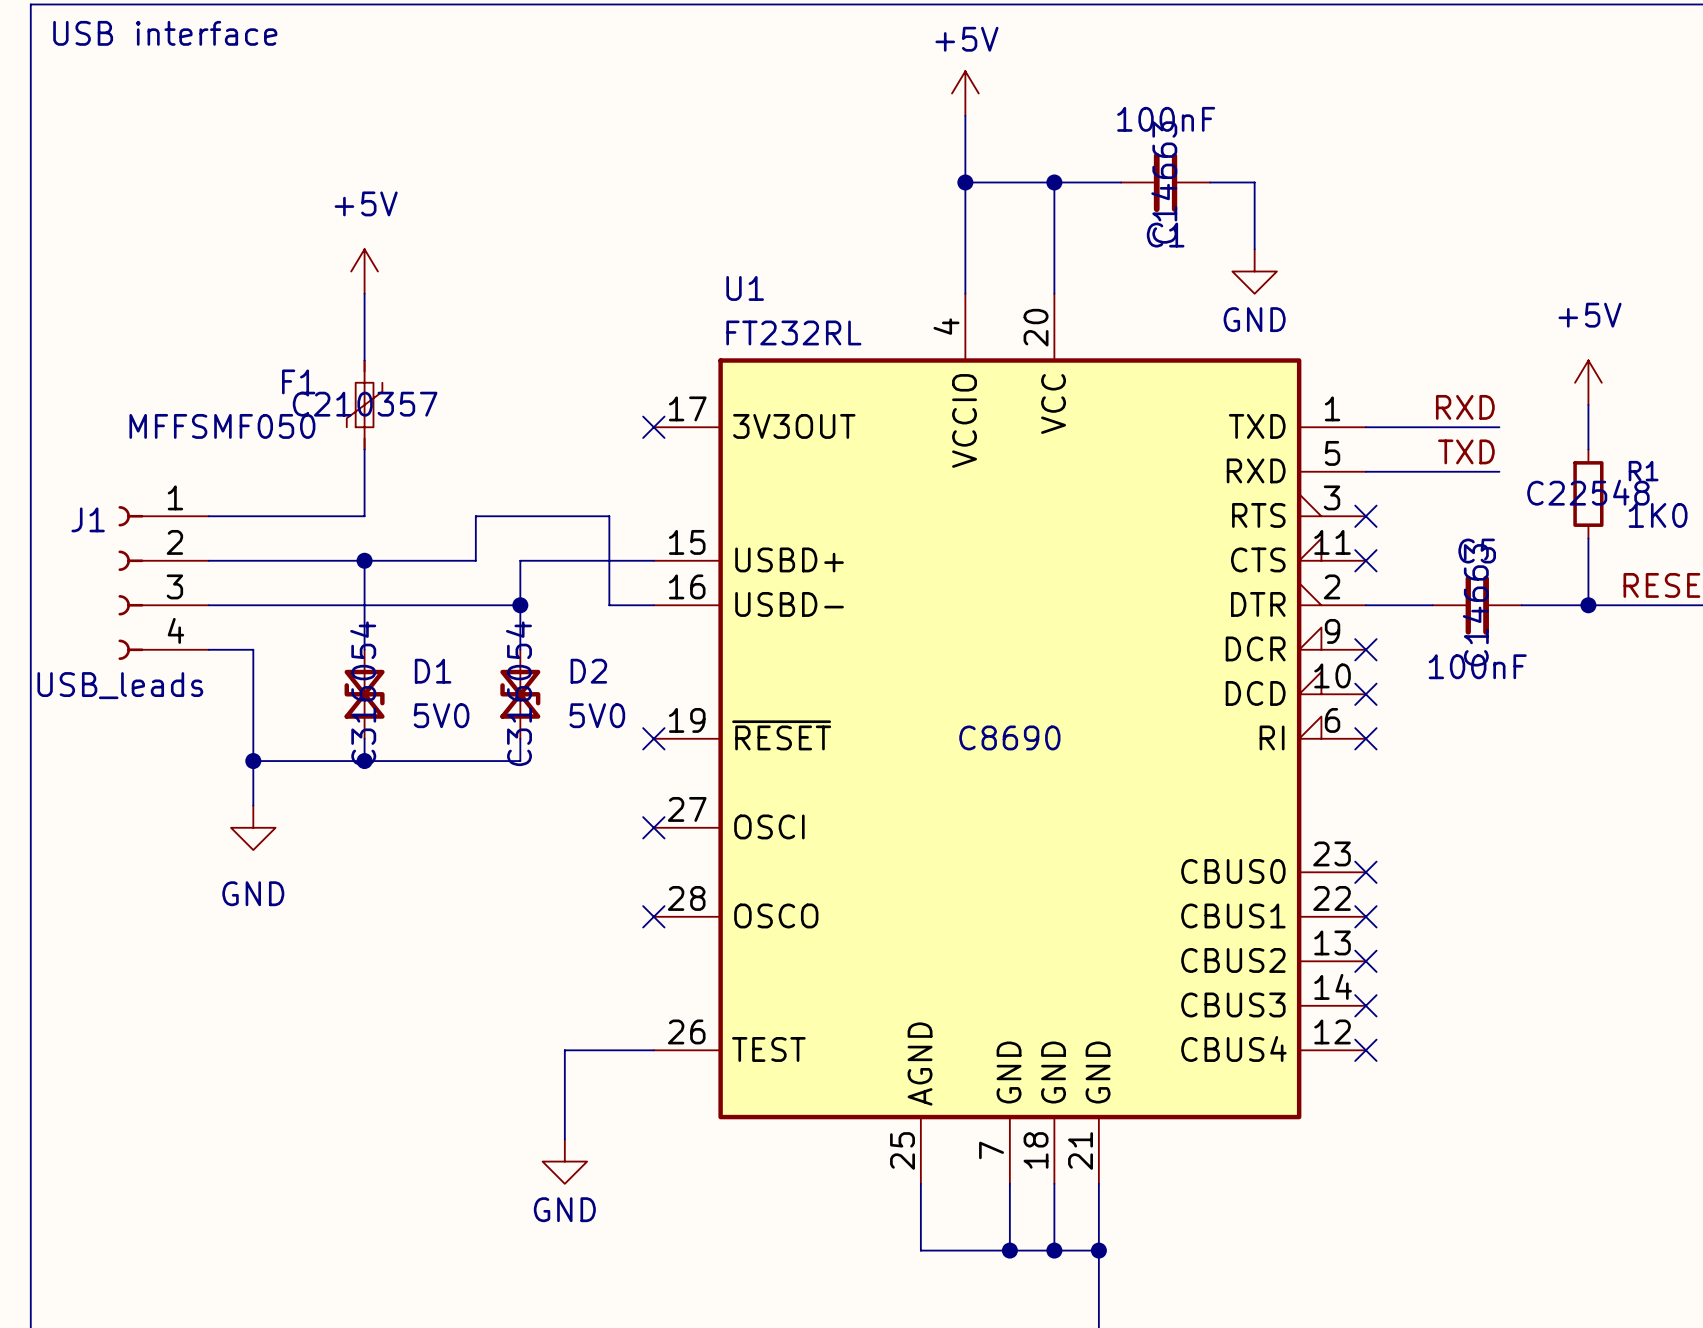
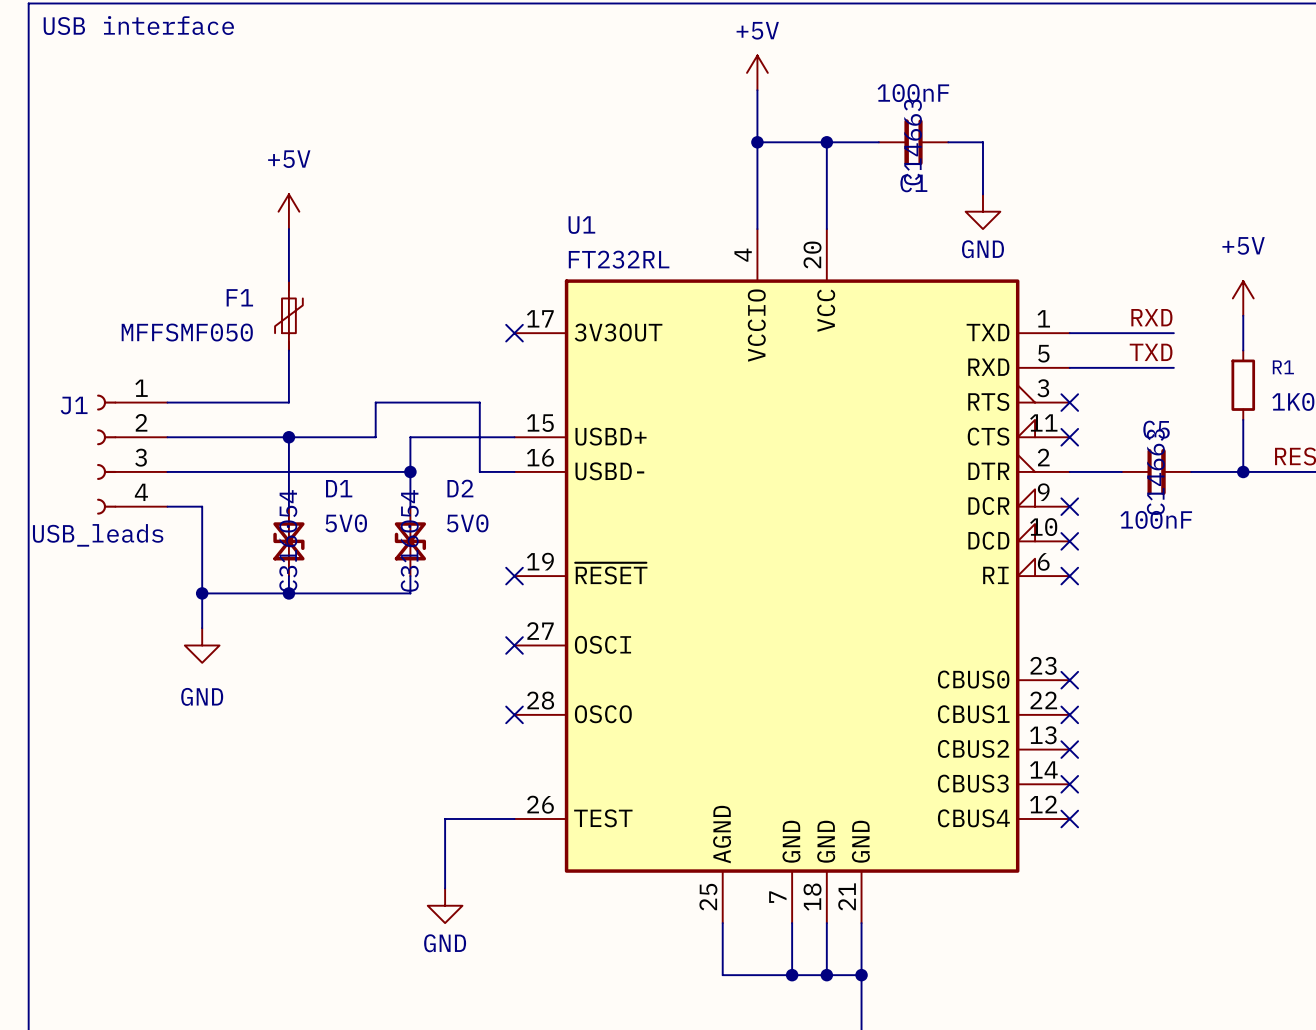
F1 text: C210357 (365, 404) -> none
R1 text: C22548 (1588, 492) -> none
D1 name position: D1 (433, 671) -> D1 (339, 488)
D2 name position: D2 (588, 671) -> D2 (460, 488)
D1 value position: 5V0 (441, 715) -> 5V0 (346, 523)
D2 value position: 5V0 (597, 715) -> 5V0 (467, 523)
U1 text: C8690 (1009, 737) -> none

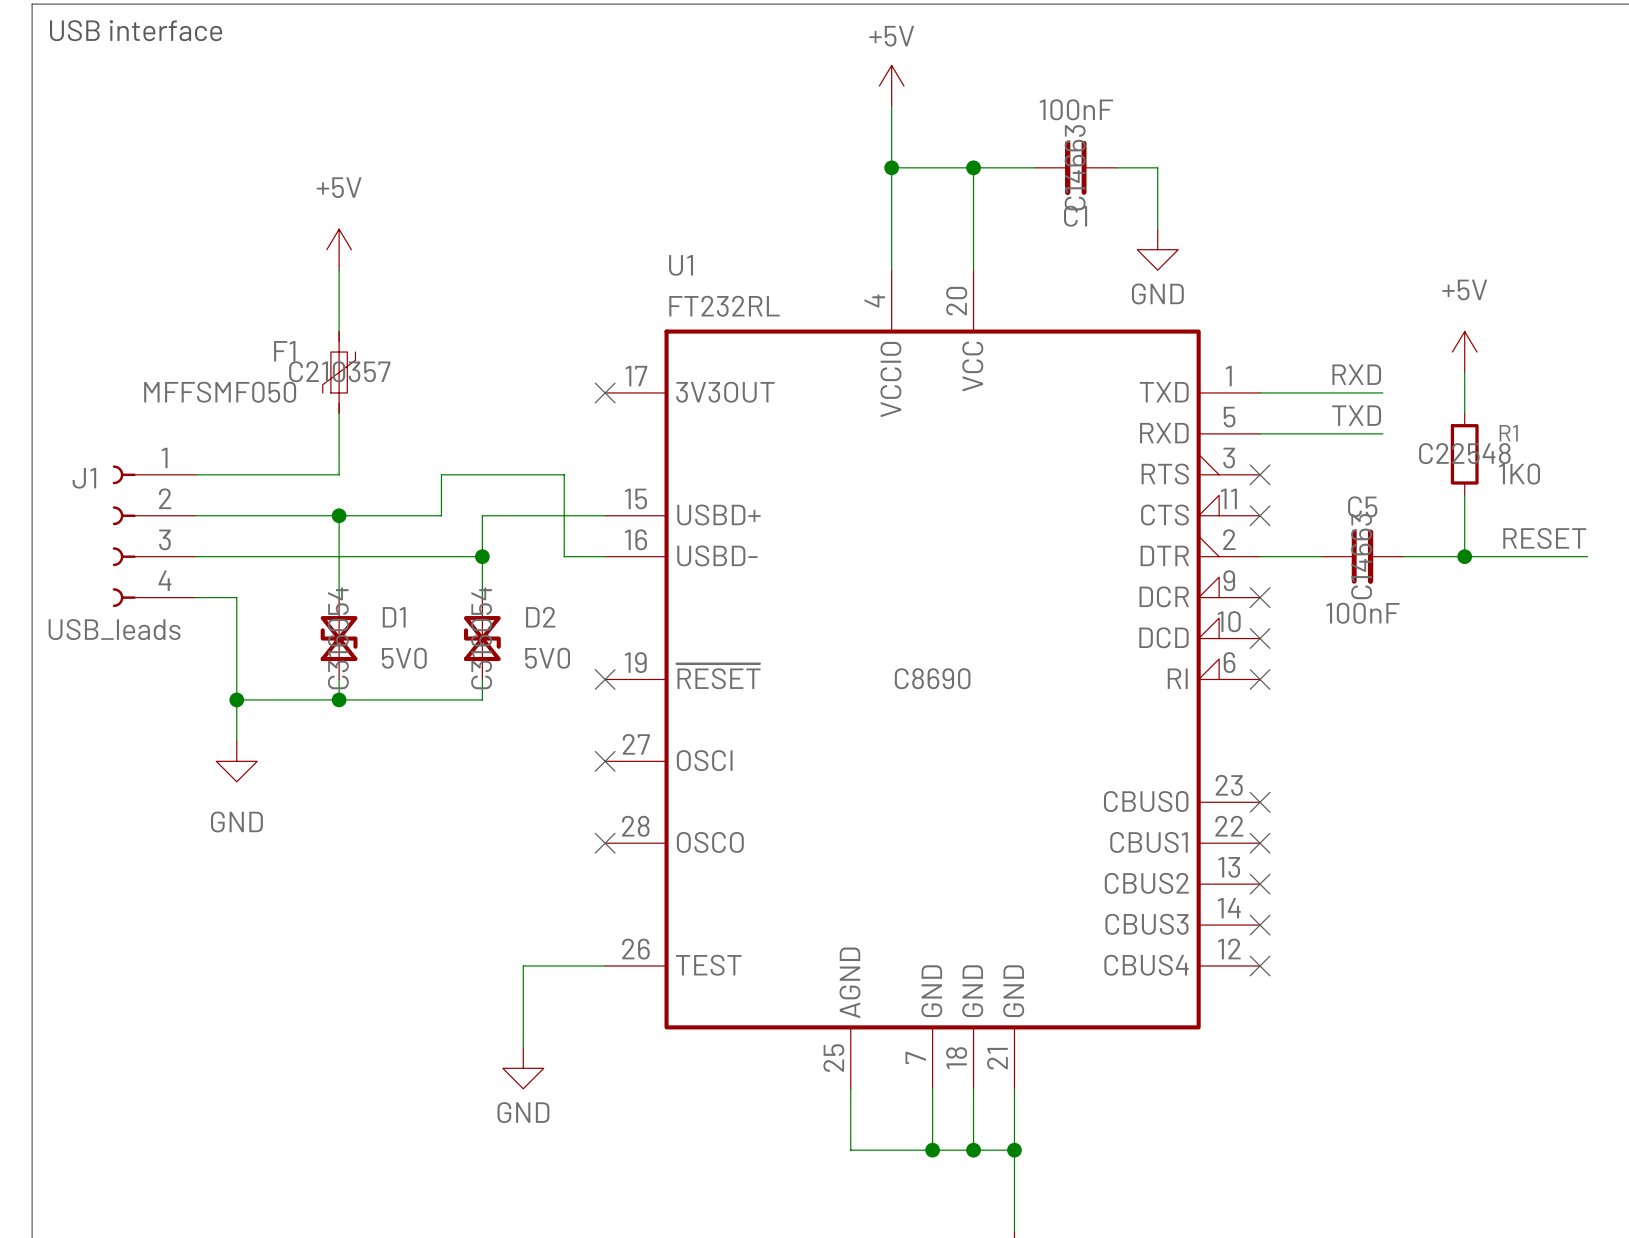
F1 text: none -> C210357 (339, 371)
R1 text: none -> C22548 (1464, 453)
D1 name position: D1 (339, 488) -> D1 (394, 617)
D2 name position: D2 (460, 488) -> D2 (540, 617)
D1 value position: 5V0 (346, 523) -> 5V0 (404, 658)
D2 value position: 5V0 (467, 523) -> 5V0 (547, 658)
U1 text: none -> C8690 (932, 678)

